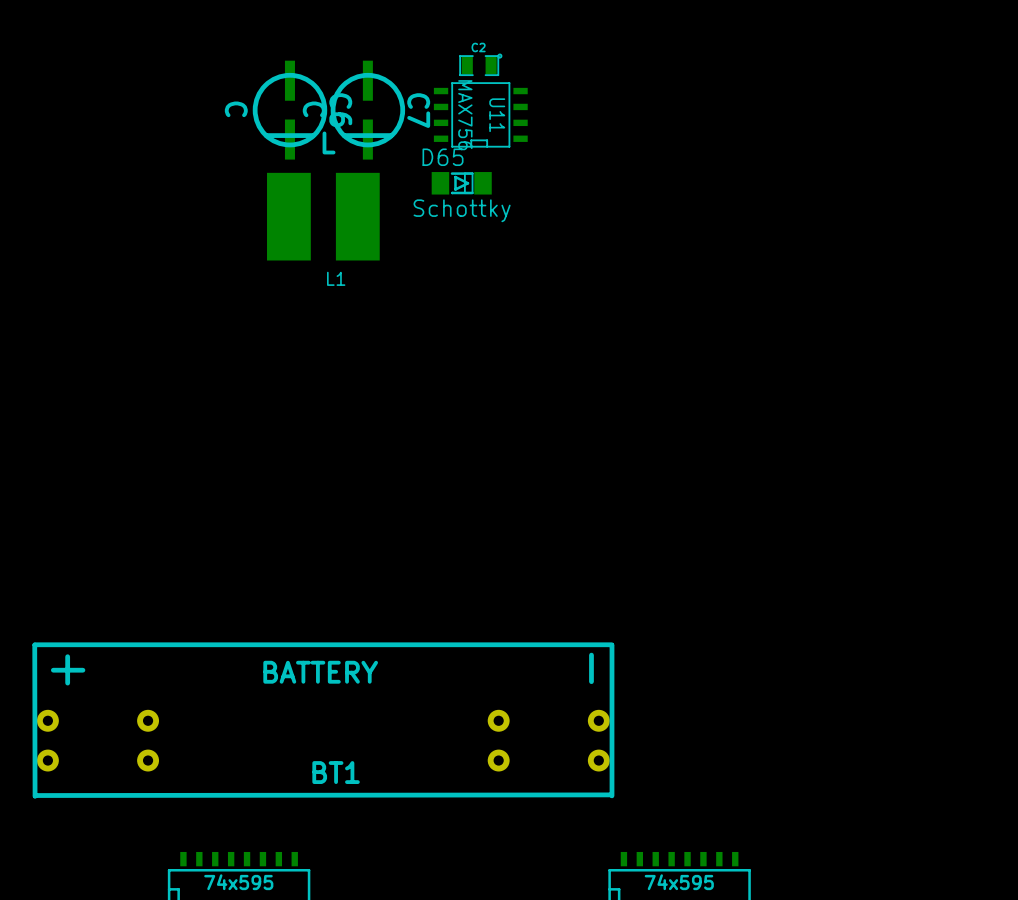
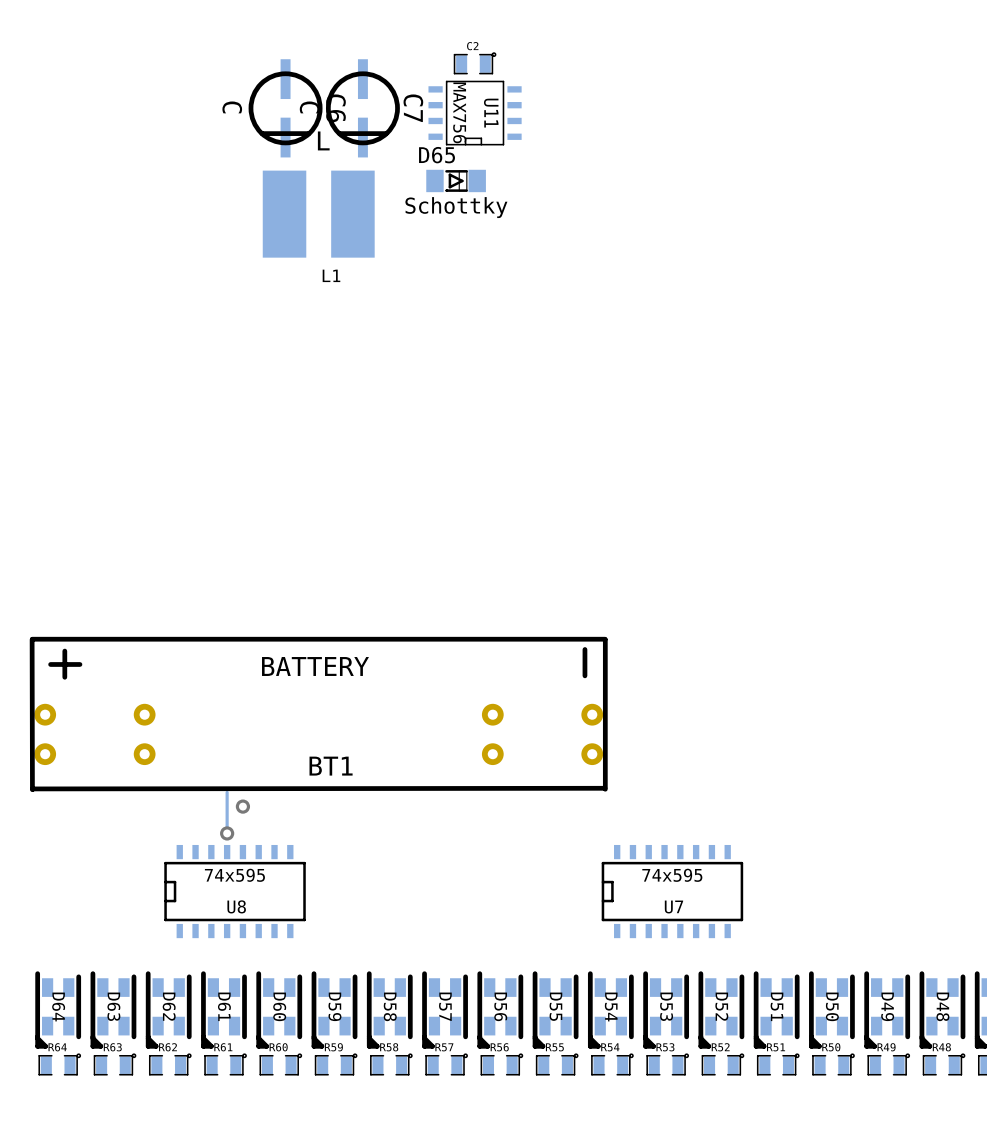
track: none -> (227, 792) (227, 833)
via: none -> (242, 806)
via: none -> (227, 833)

